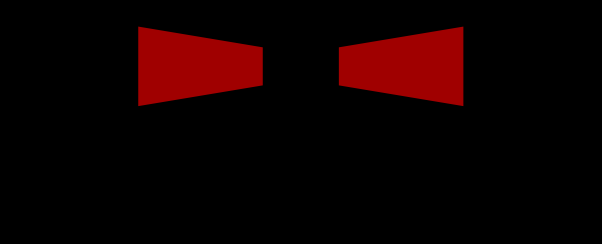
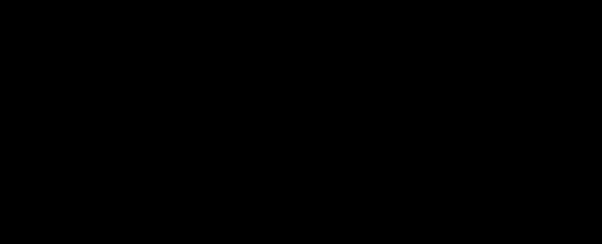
part: (300, 66) -> none

